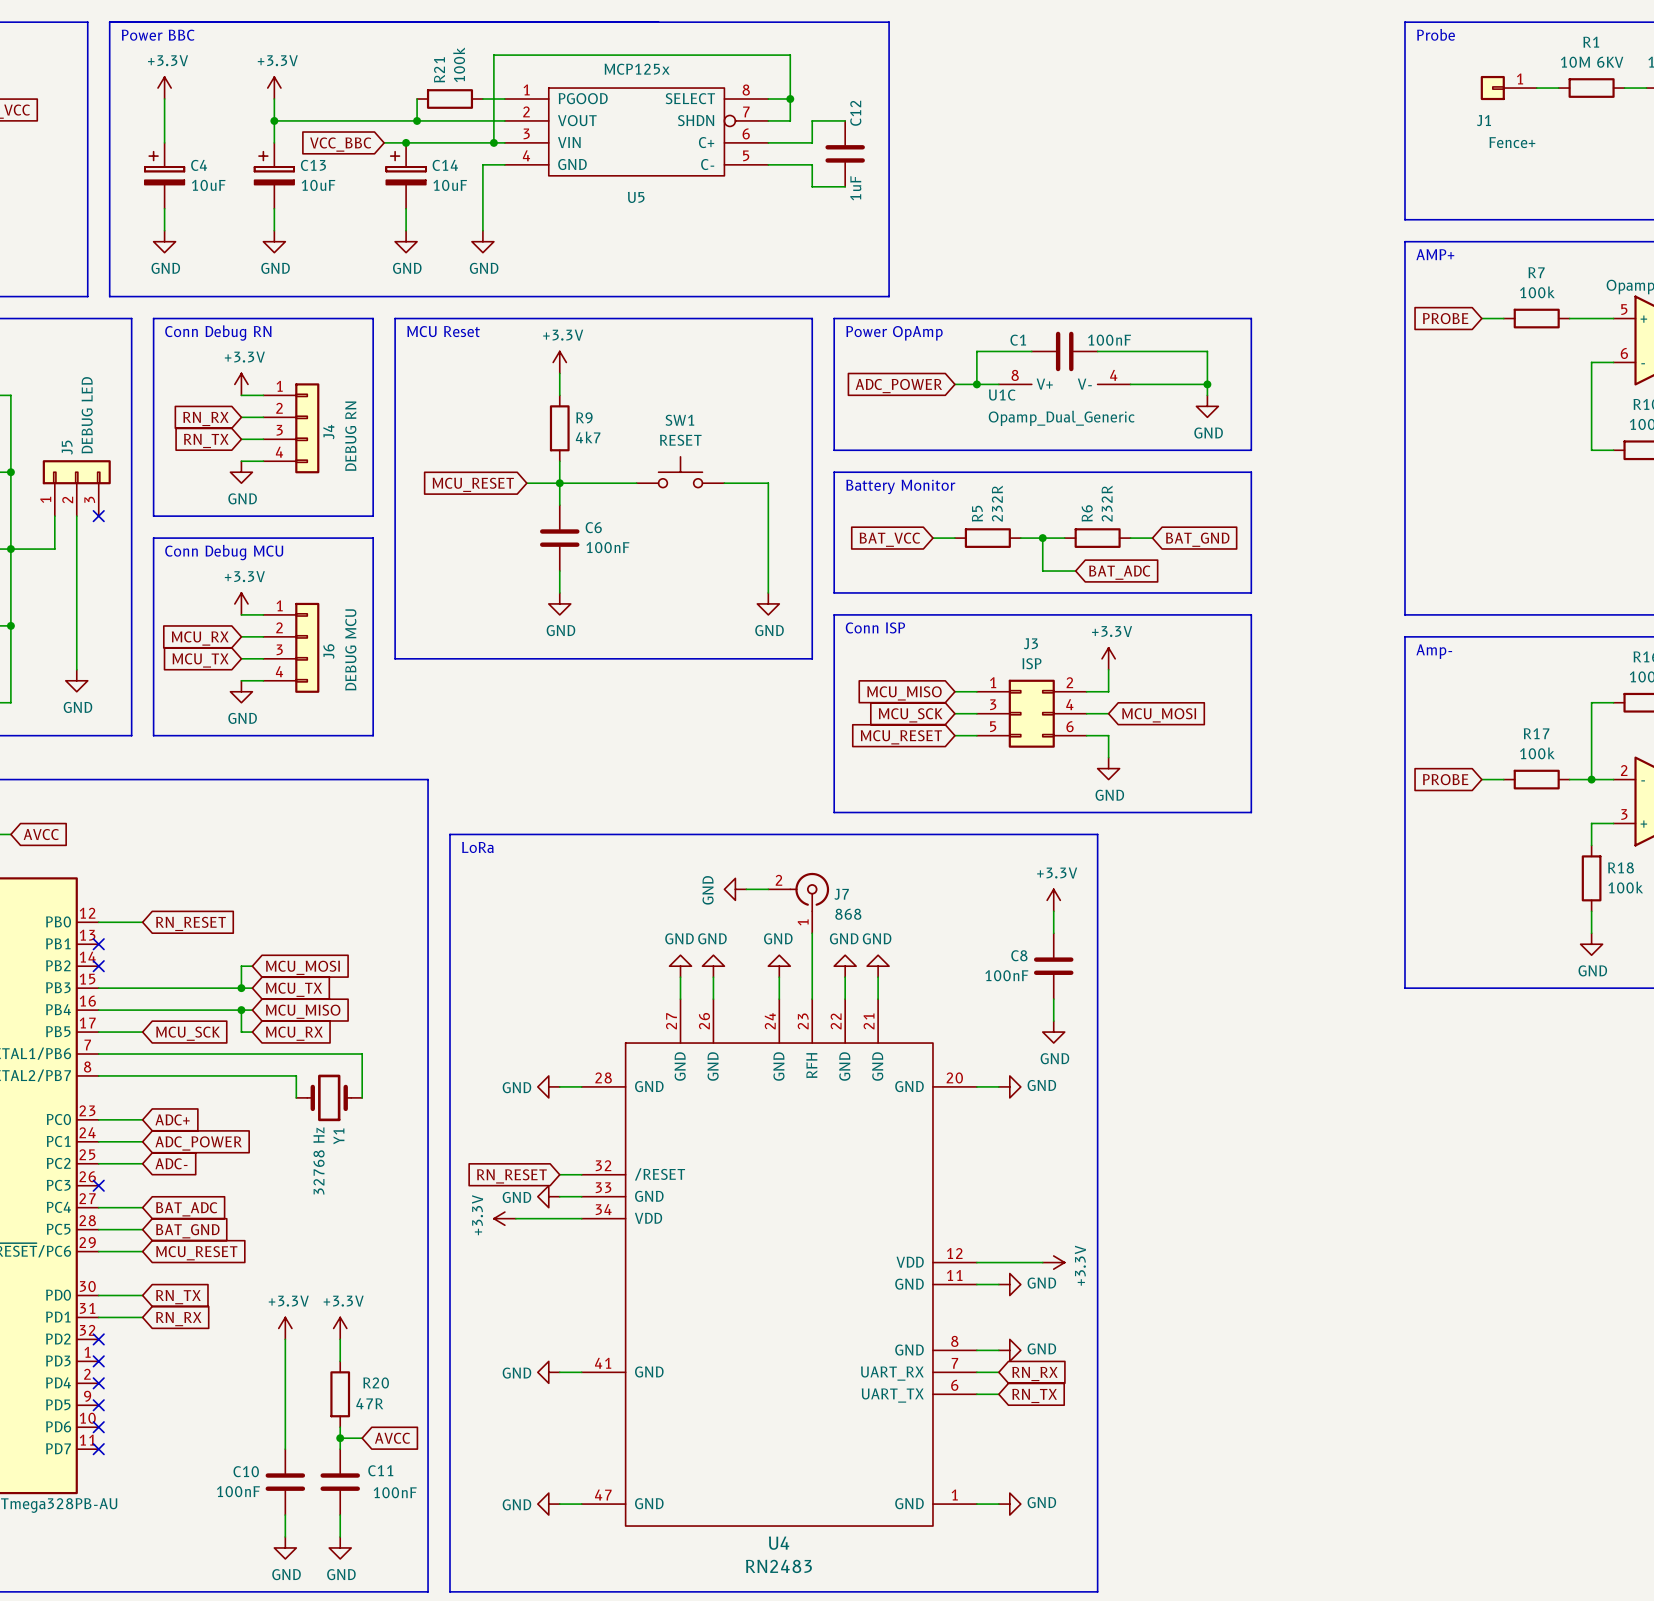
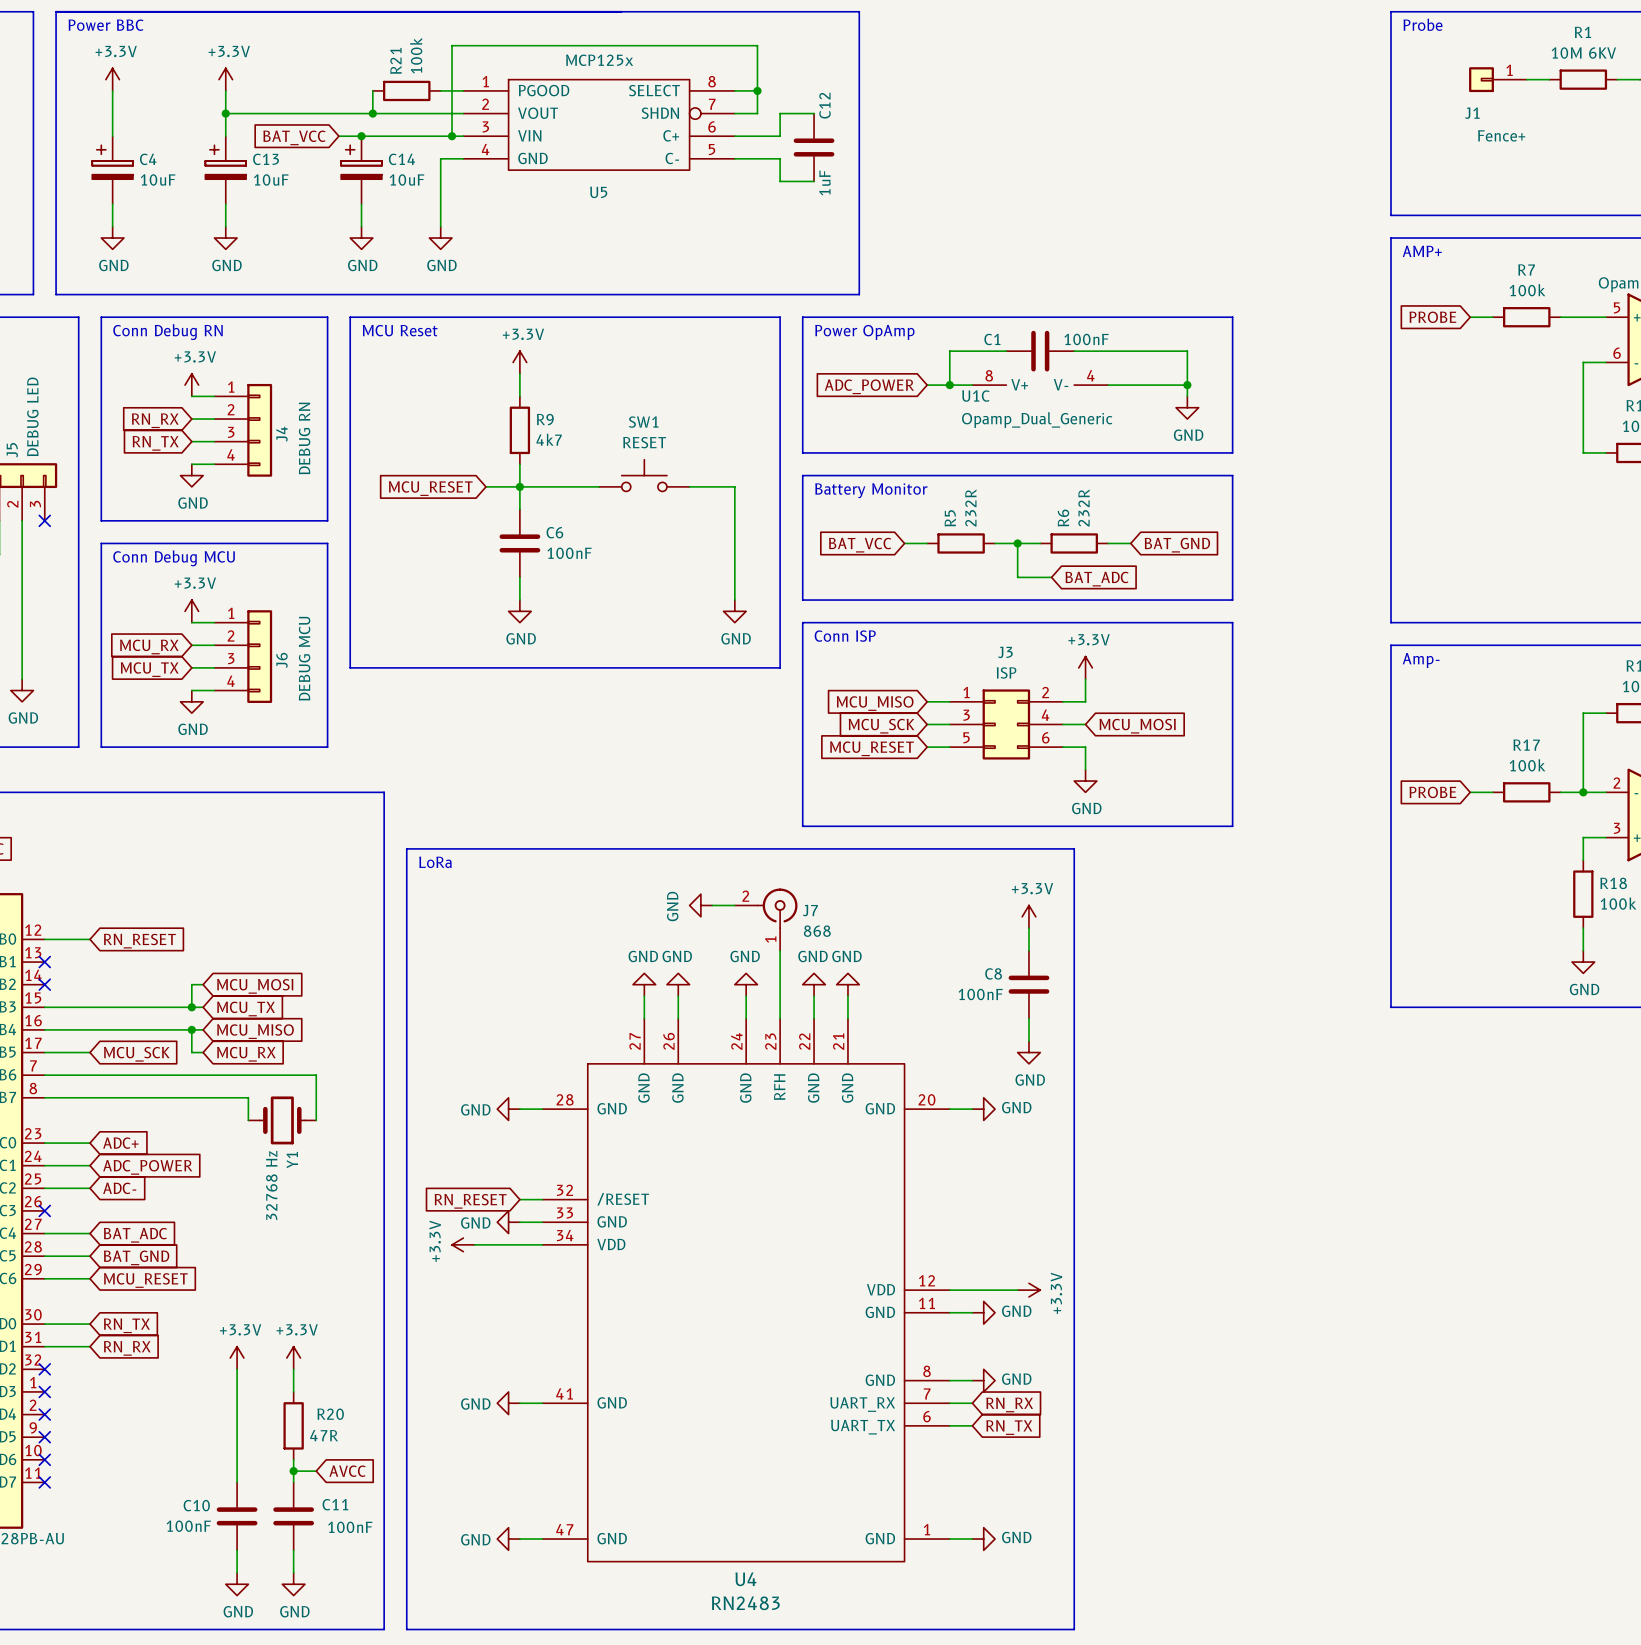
global label: VCC_BBC (340, 144) -> BAT_VCC (294, 137)

